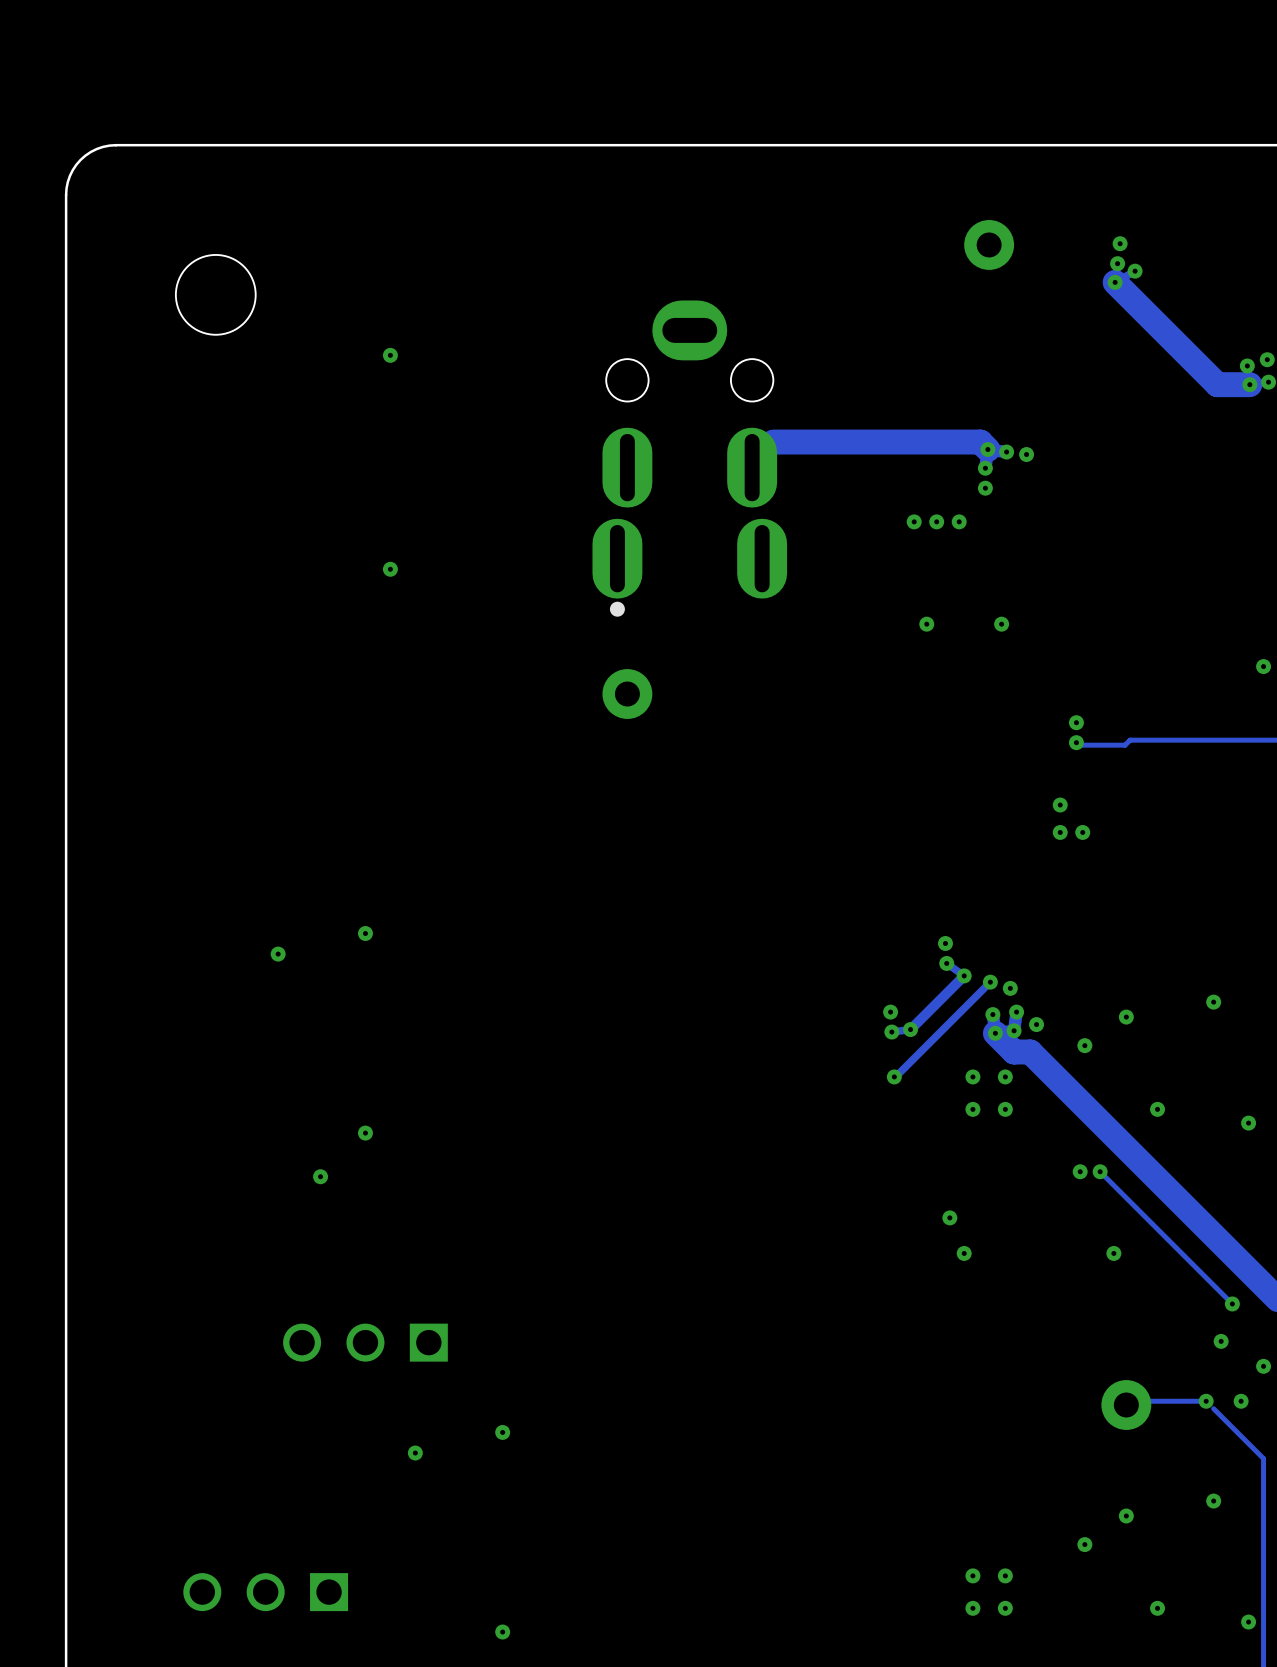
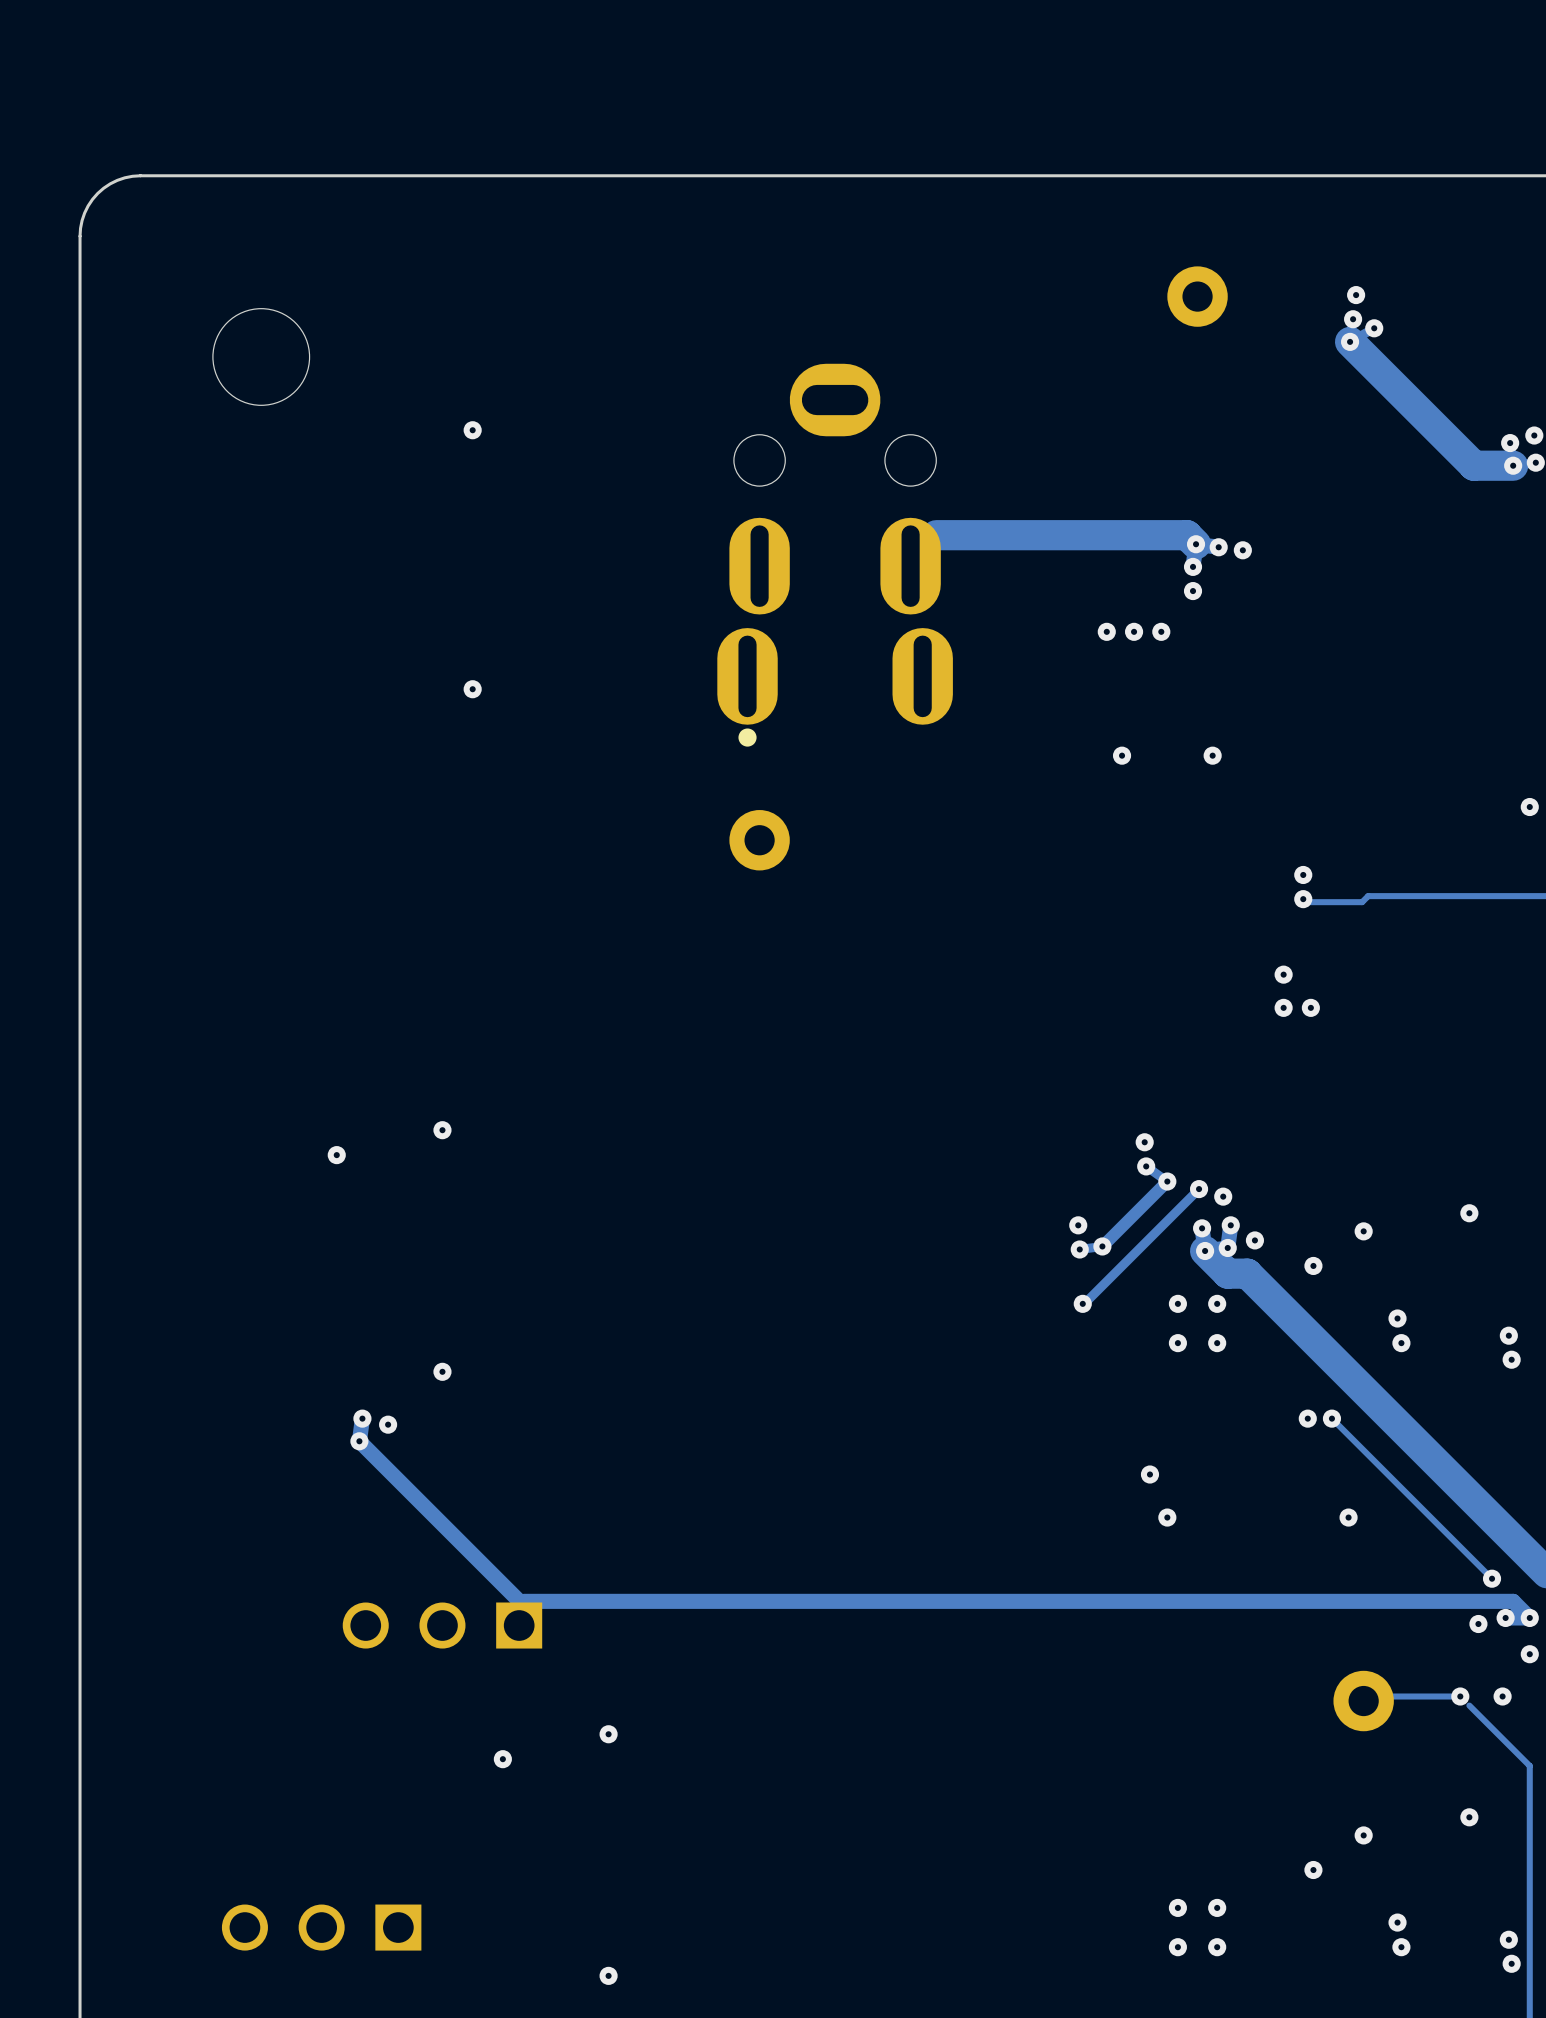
via: none -> (1397, 1318)
via: none -> (1508, 1335)
track: none -> (362, 1418) (359, 1441) (519, 1601) (519, 1624)
via: none -> (362, 1418)
via: none -> (359, 1441)
track: none -> (524, 1601) (1513, 1601) (1529, 1617) (1505, 1617)
via: none -> (1505, 1617)
via: none -> (1529, 1617)
via: none -> (1397, 1922)
via: none -> (1508, 1939)

